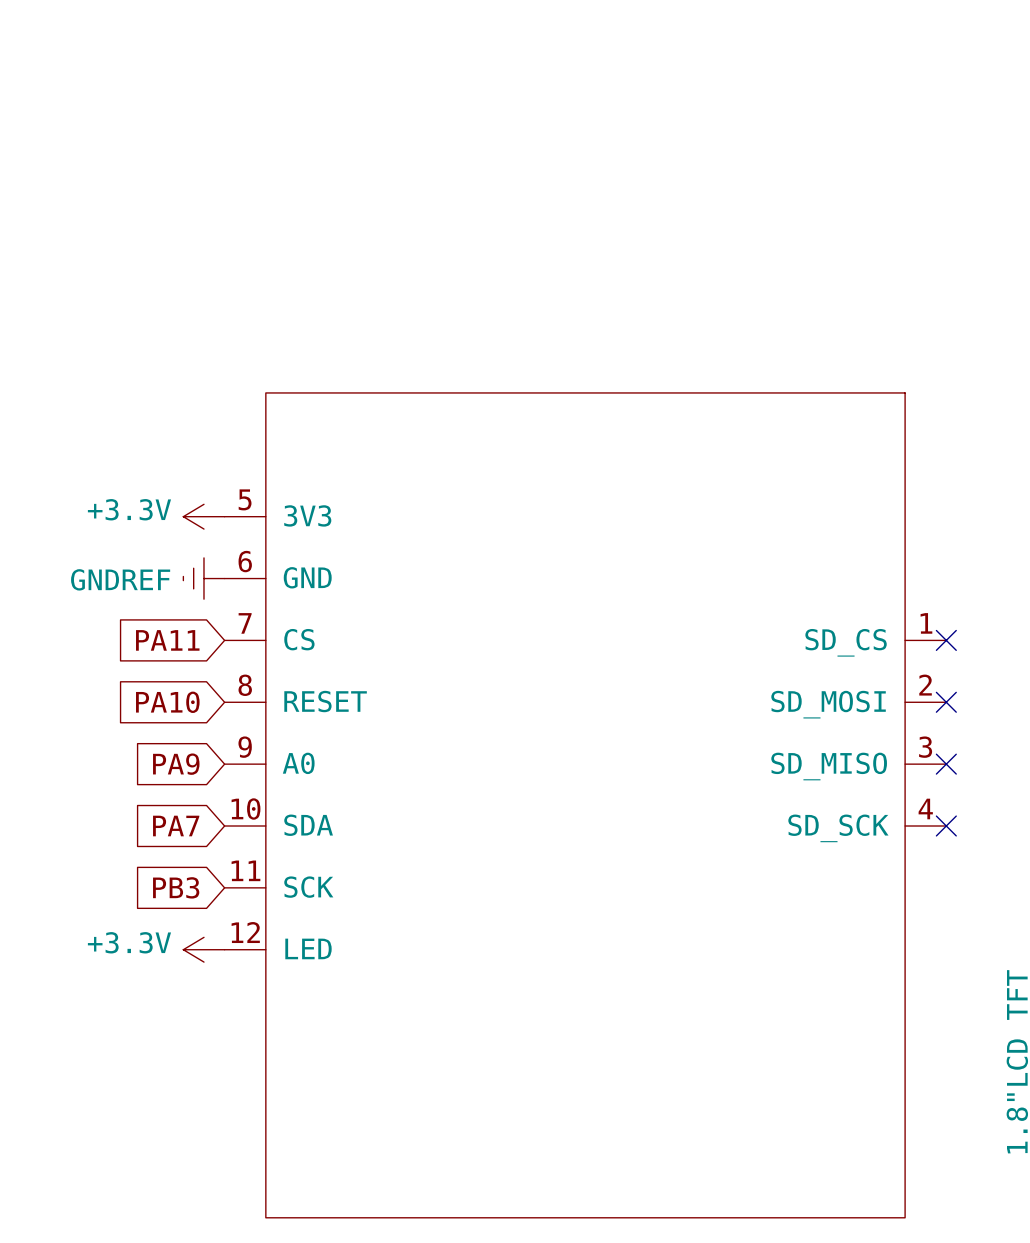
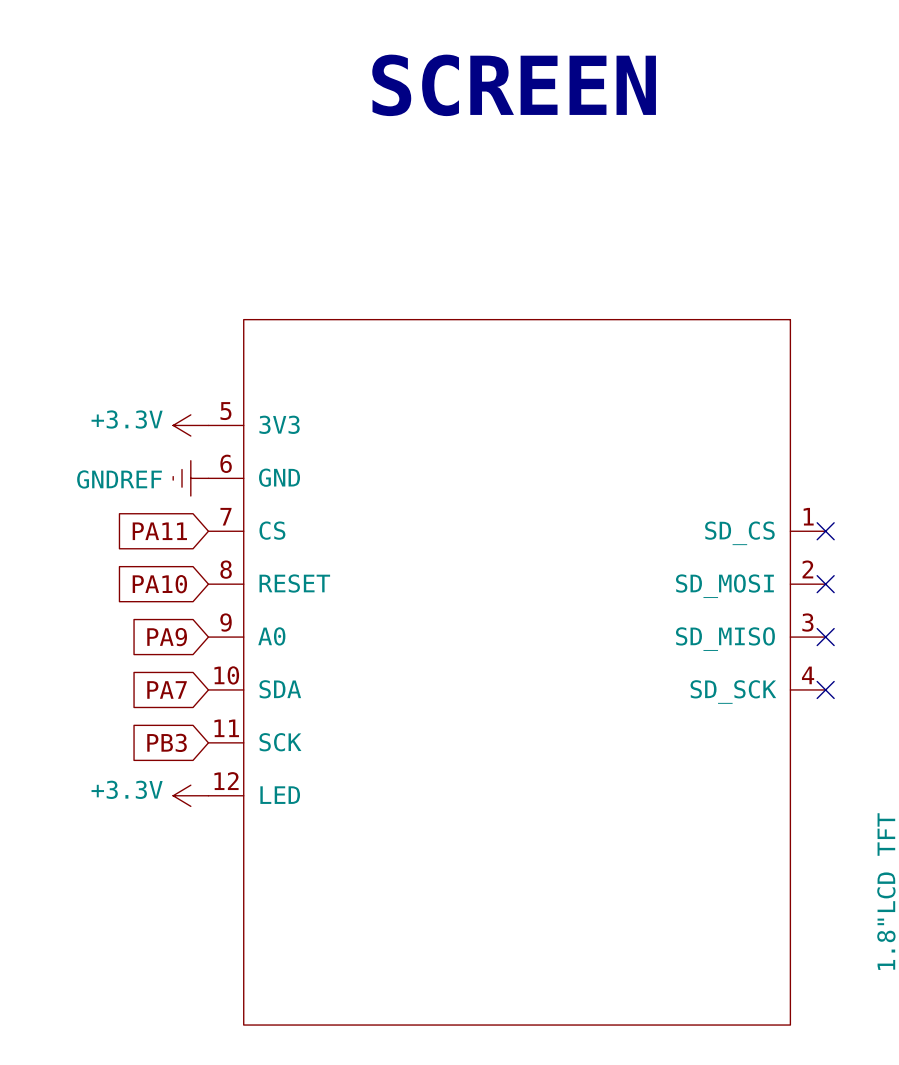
text: none -> SCREEN (514, 85)

